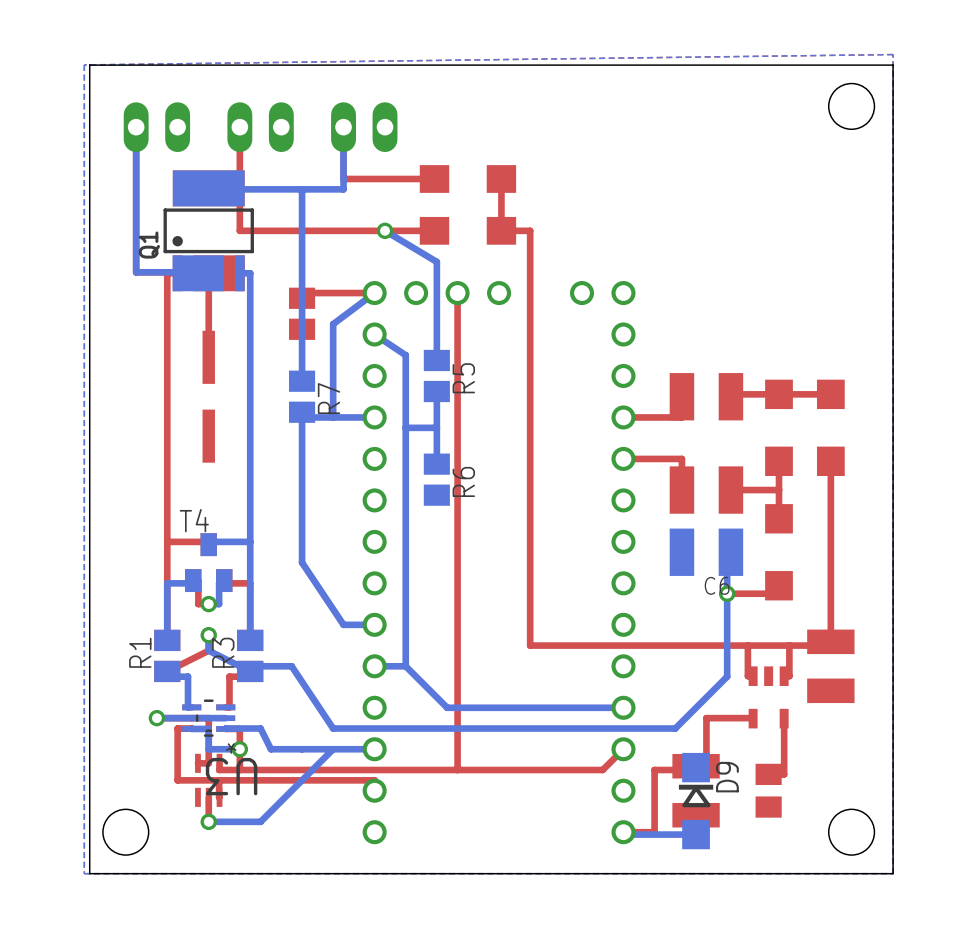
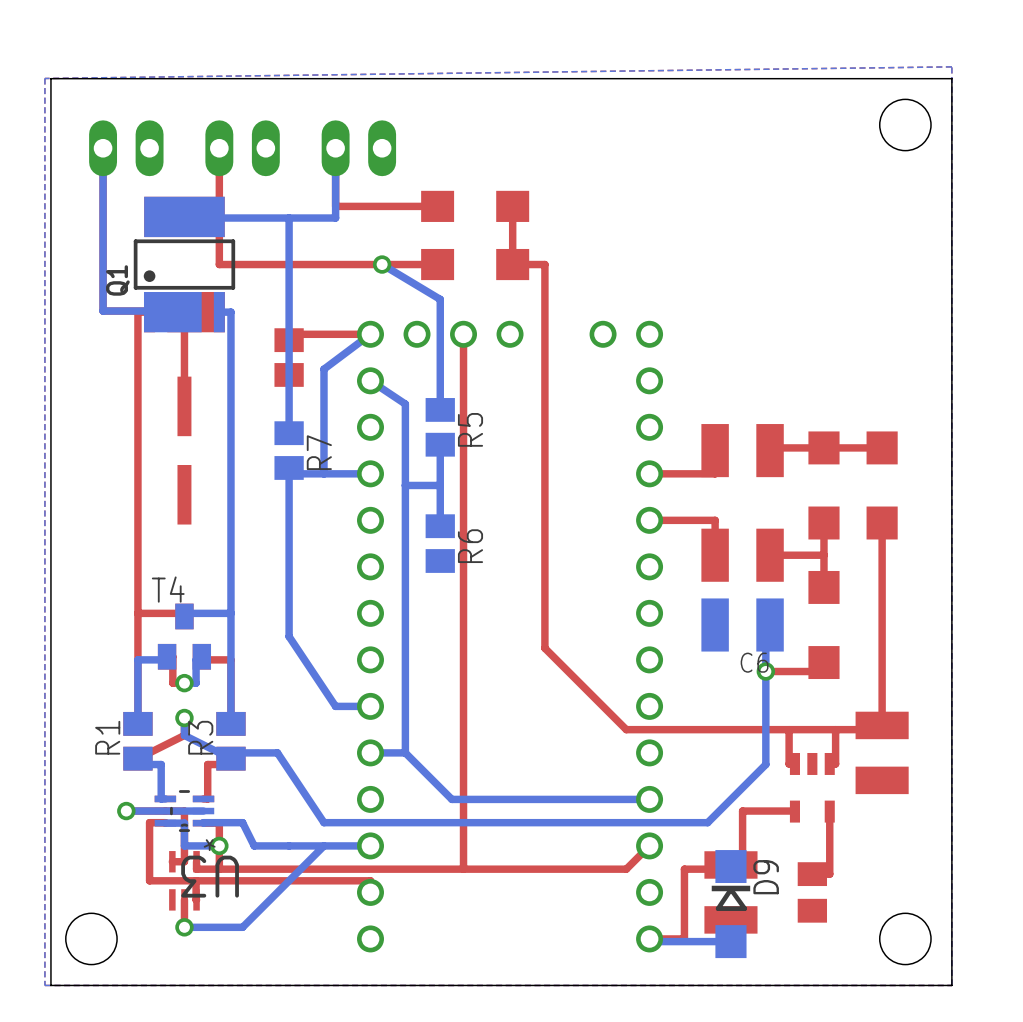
top track: (530, 572) (530, 645) (602, 645) -> (544, 648) (626, 729)

